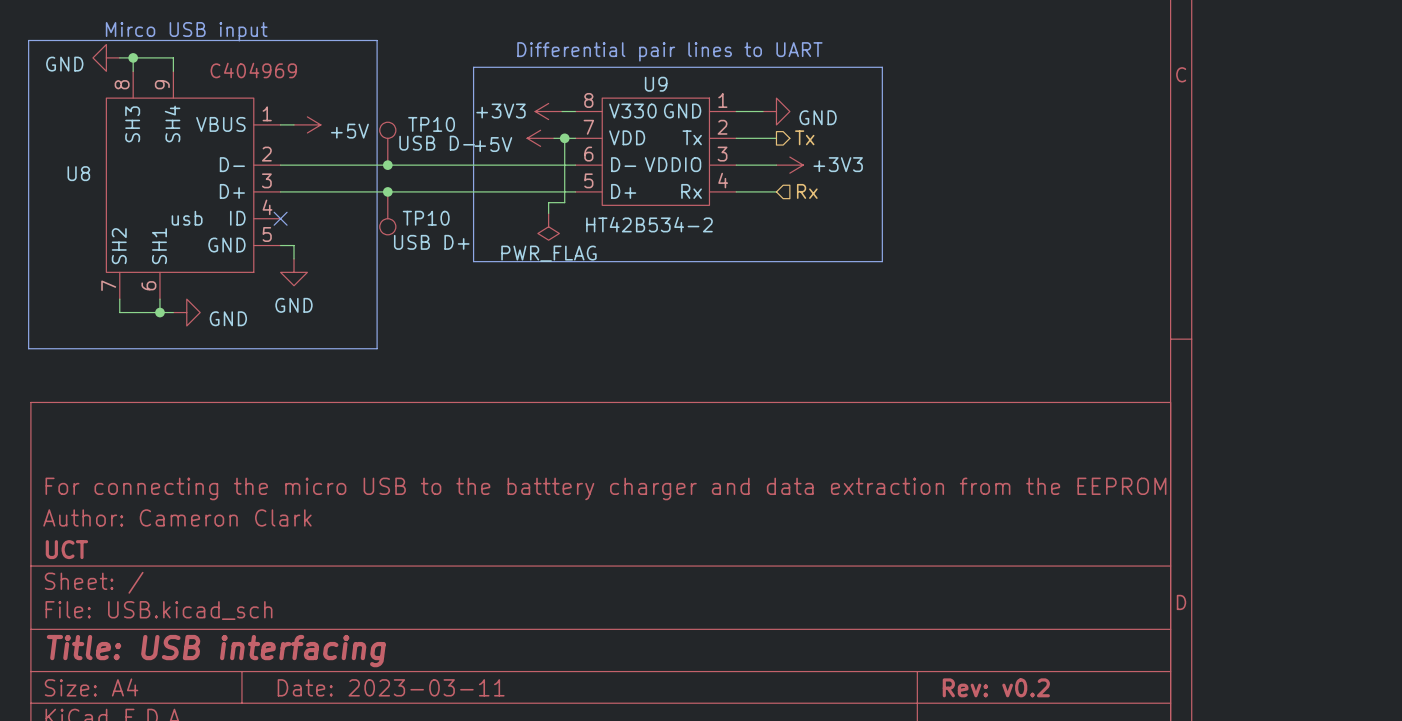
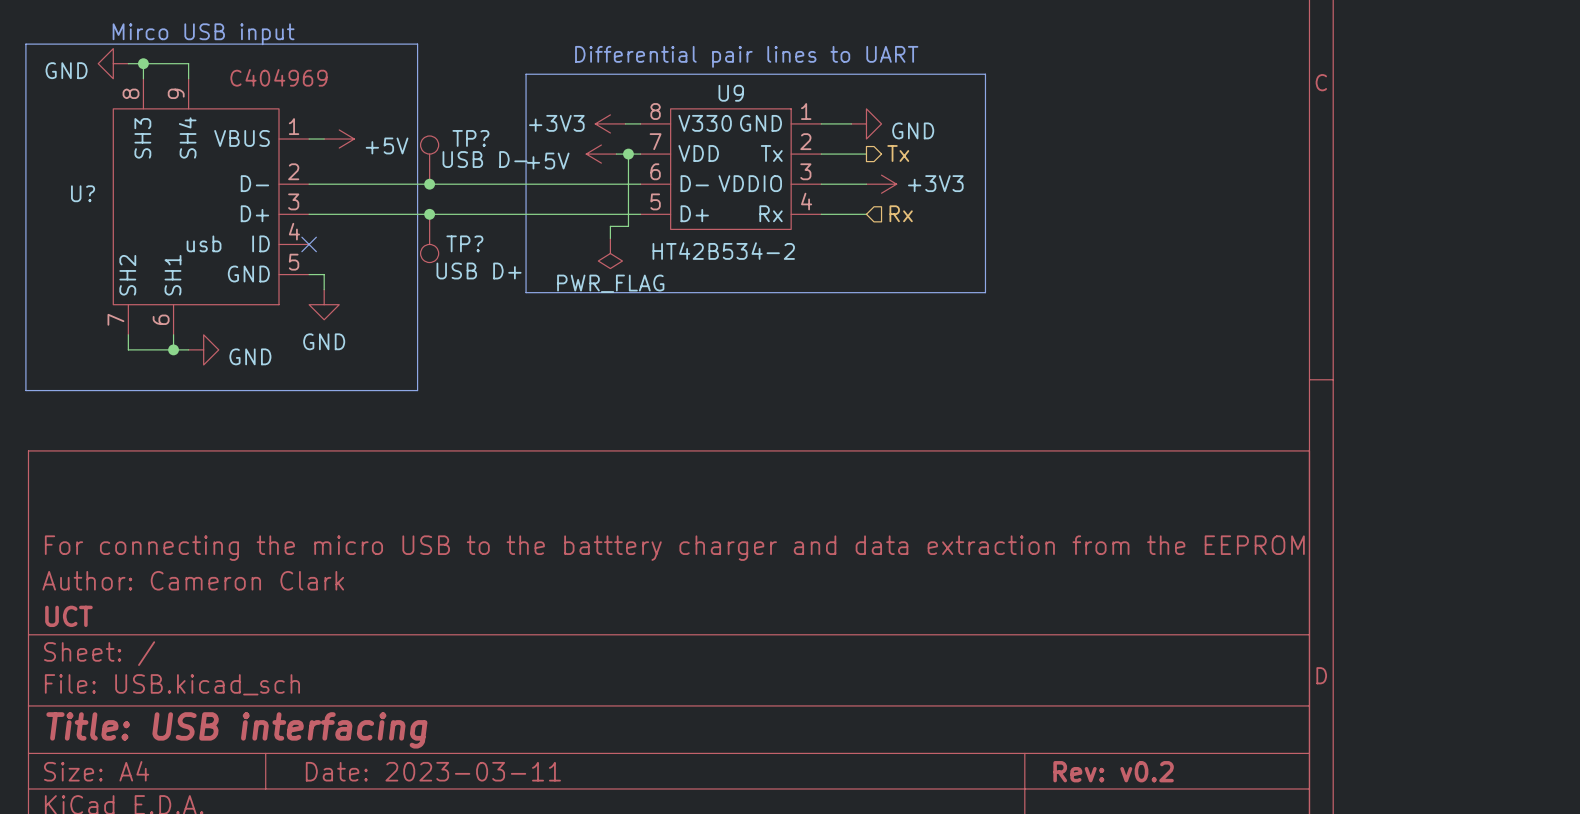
TP10 name: TP10 (431, 124) -> TP? (470, 138)
U8 name: U8 (78, 173) -> U? (83, 193)
TP10 name: TP10 (426, 218) -> TP? (464, 243)

